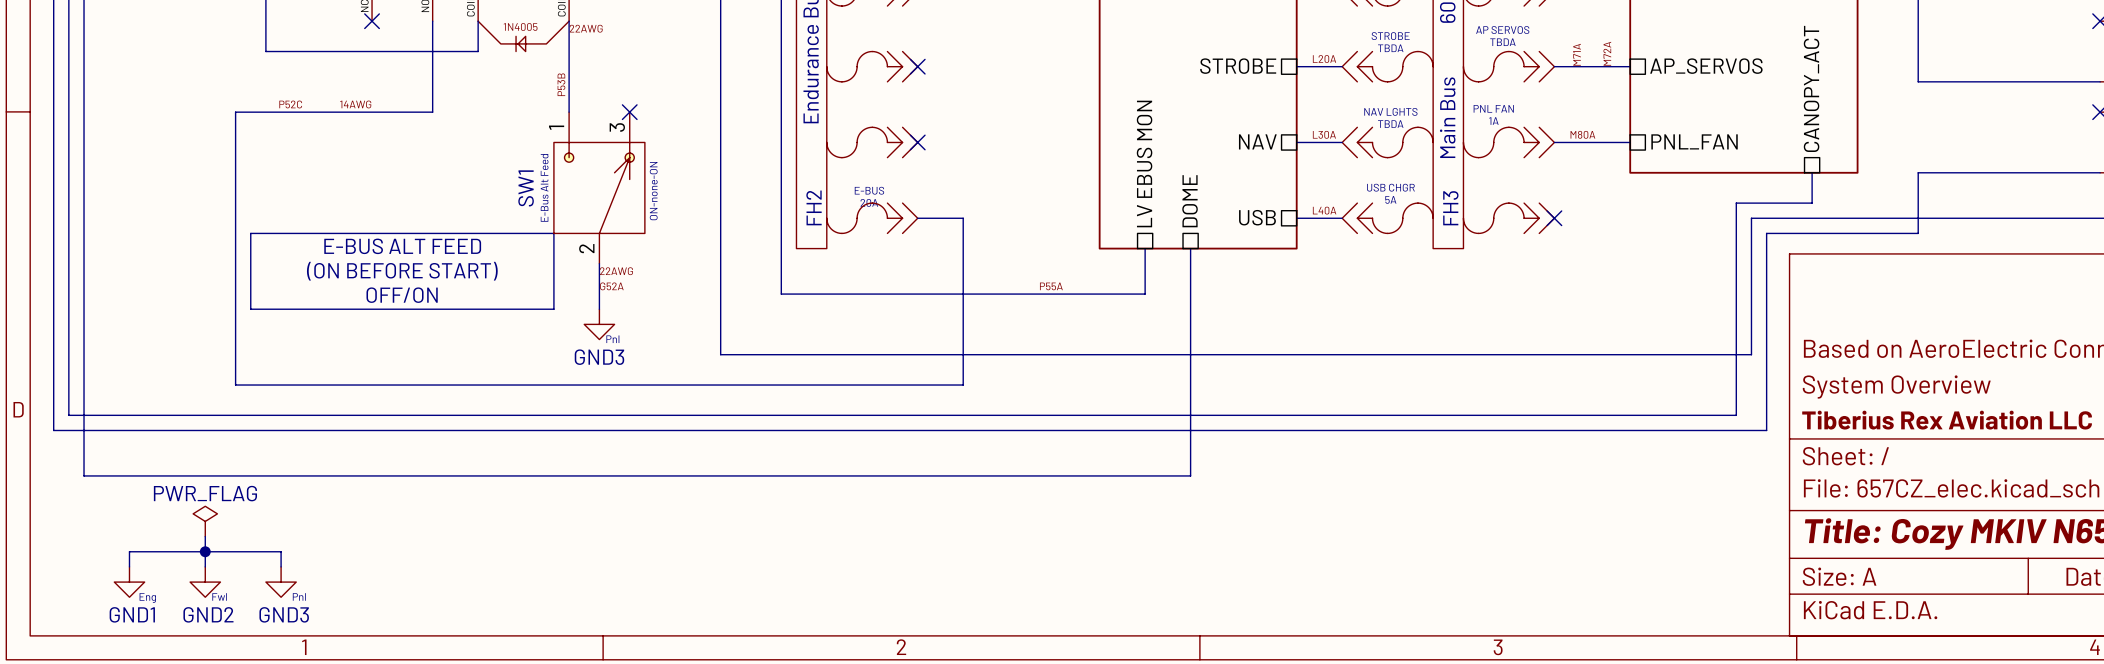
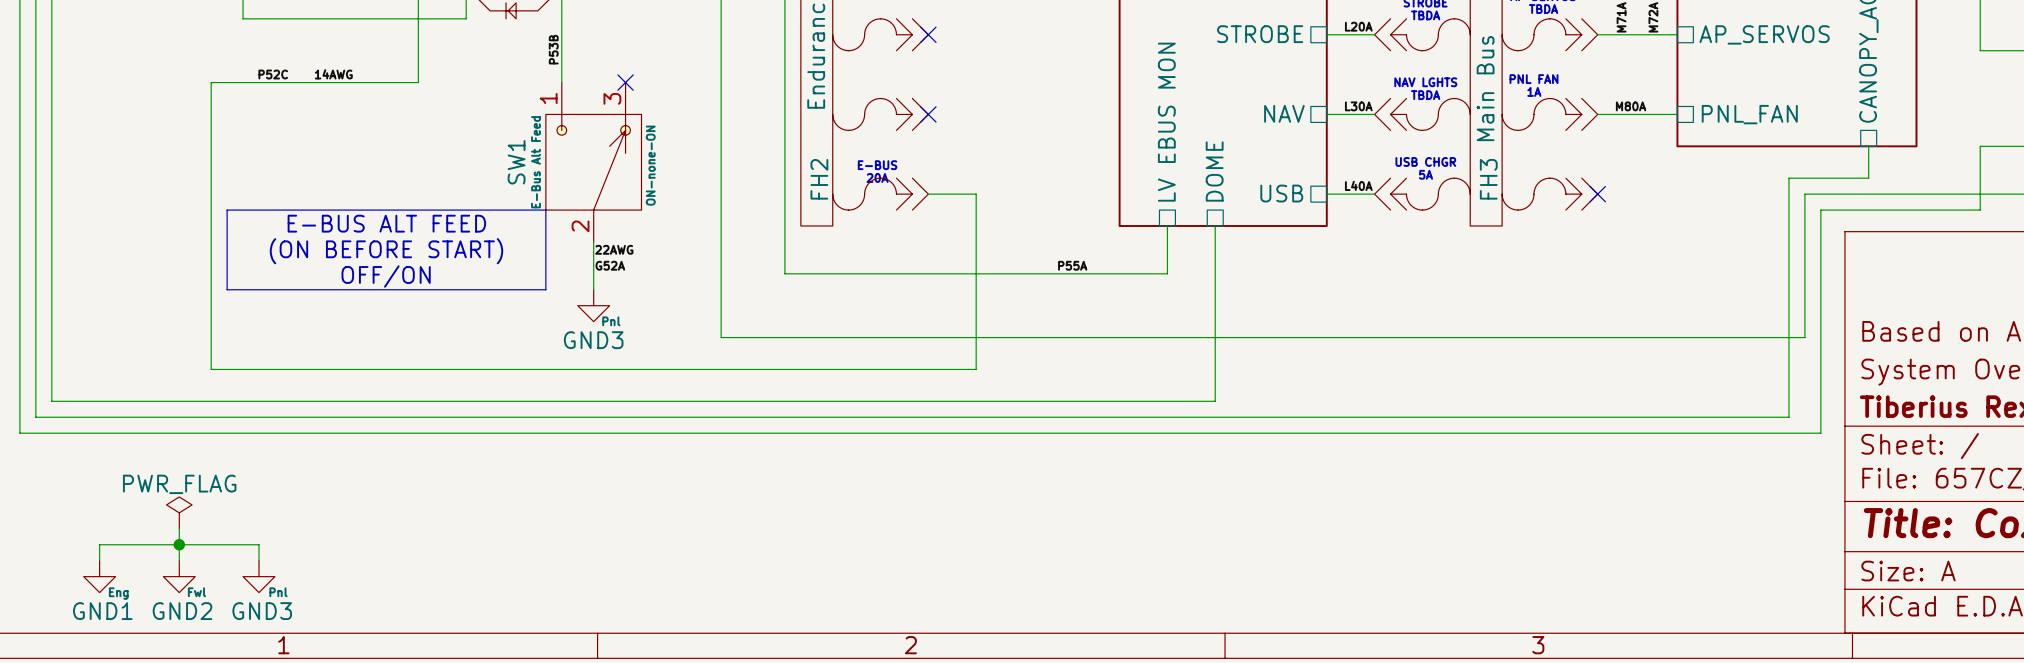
wire: (68, 415) (84, 415) (84, 475) (1190, 475) (1190, 415) (1736, 415) -> none
wire: (53, 430) (68, 430) -> (35, 401) (35, 417)
wire: none -> (19, 417) (19, 433) (1820, 433) (1820, 417)
wire: (1736, 430) (1766, 430) -> (1788, 417) (1788, 401)

